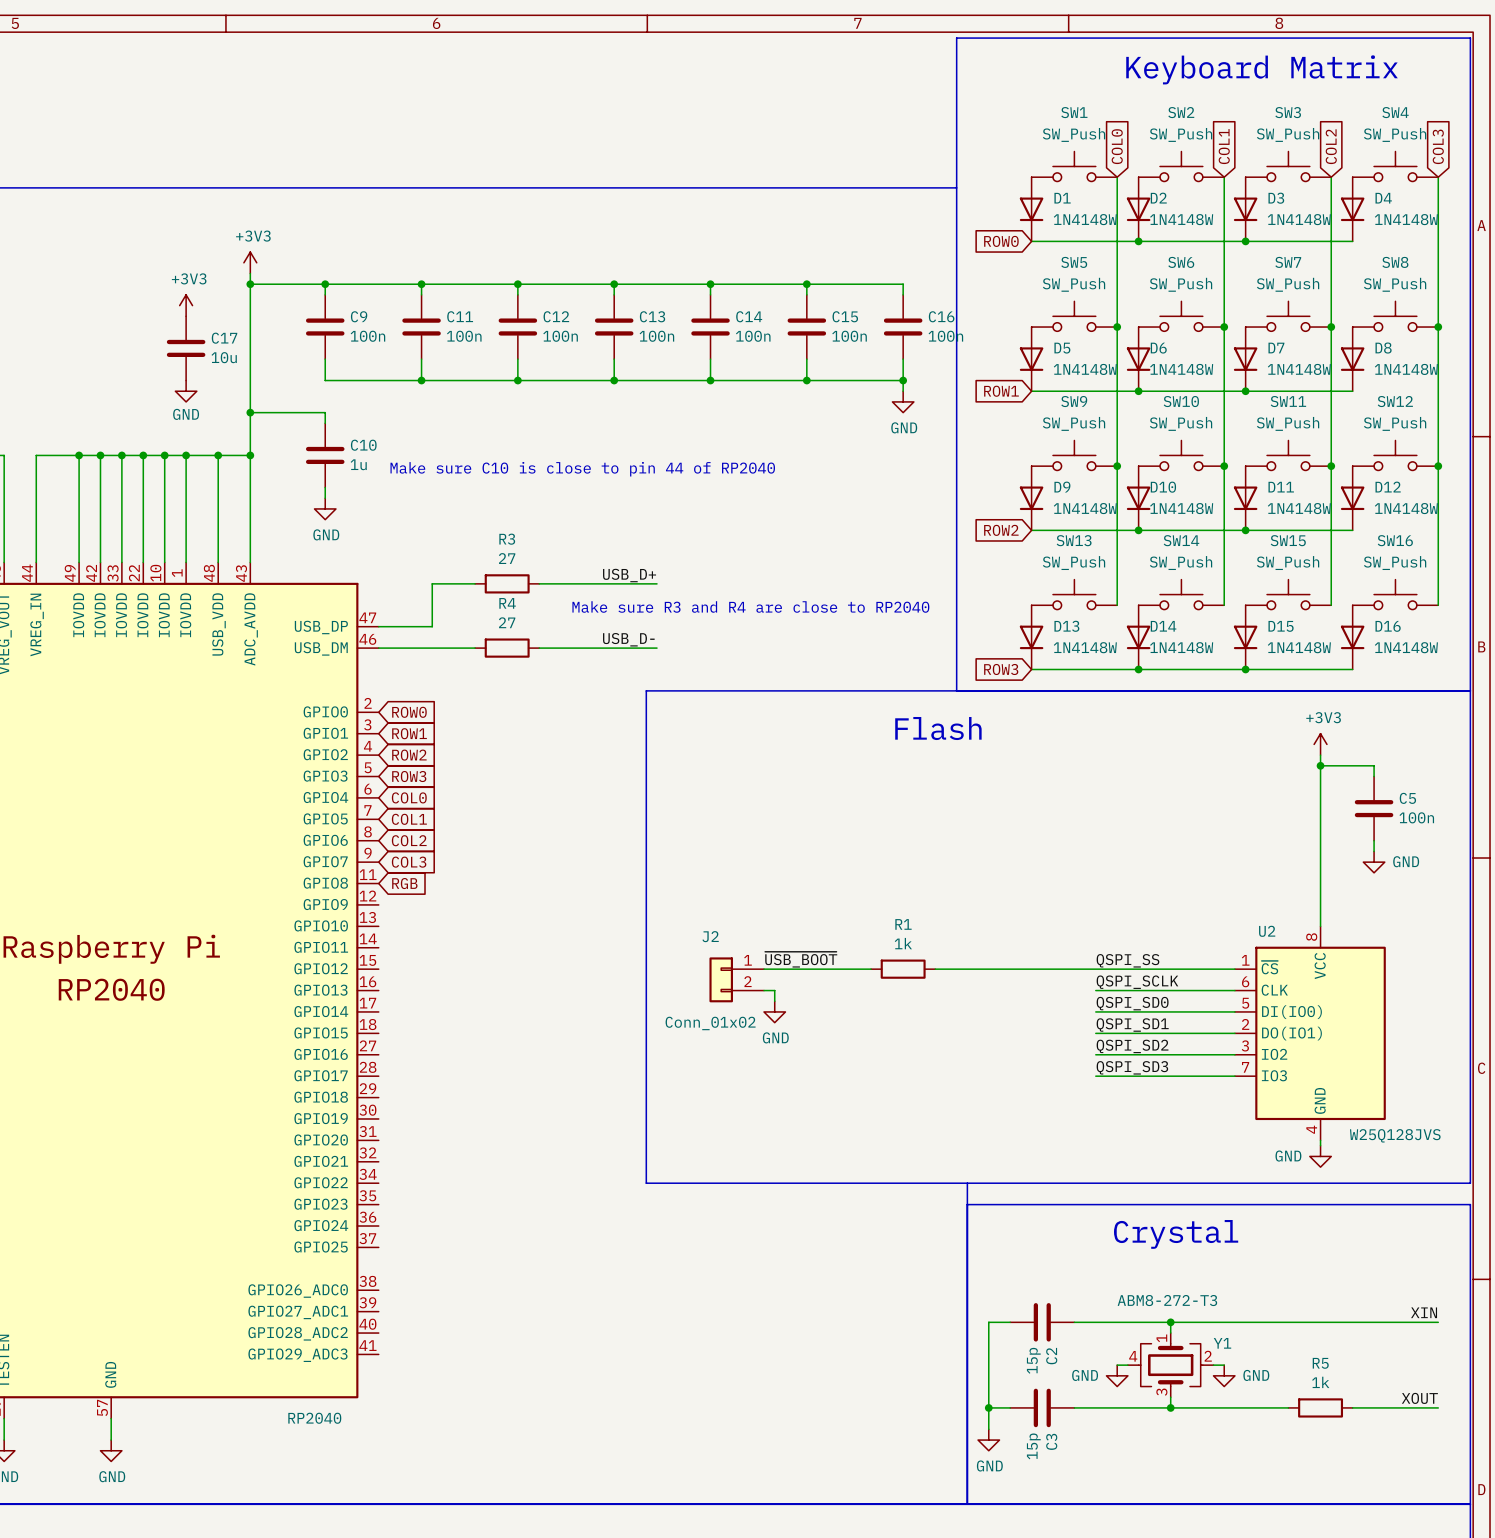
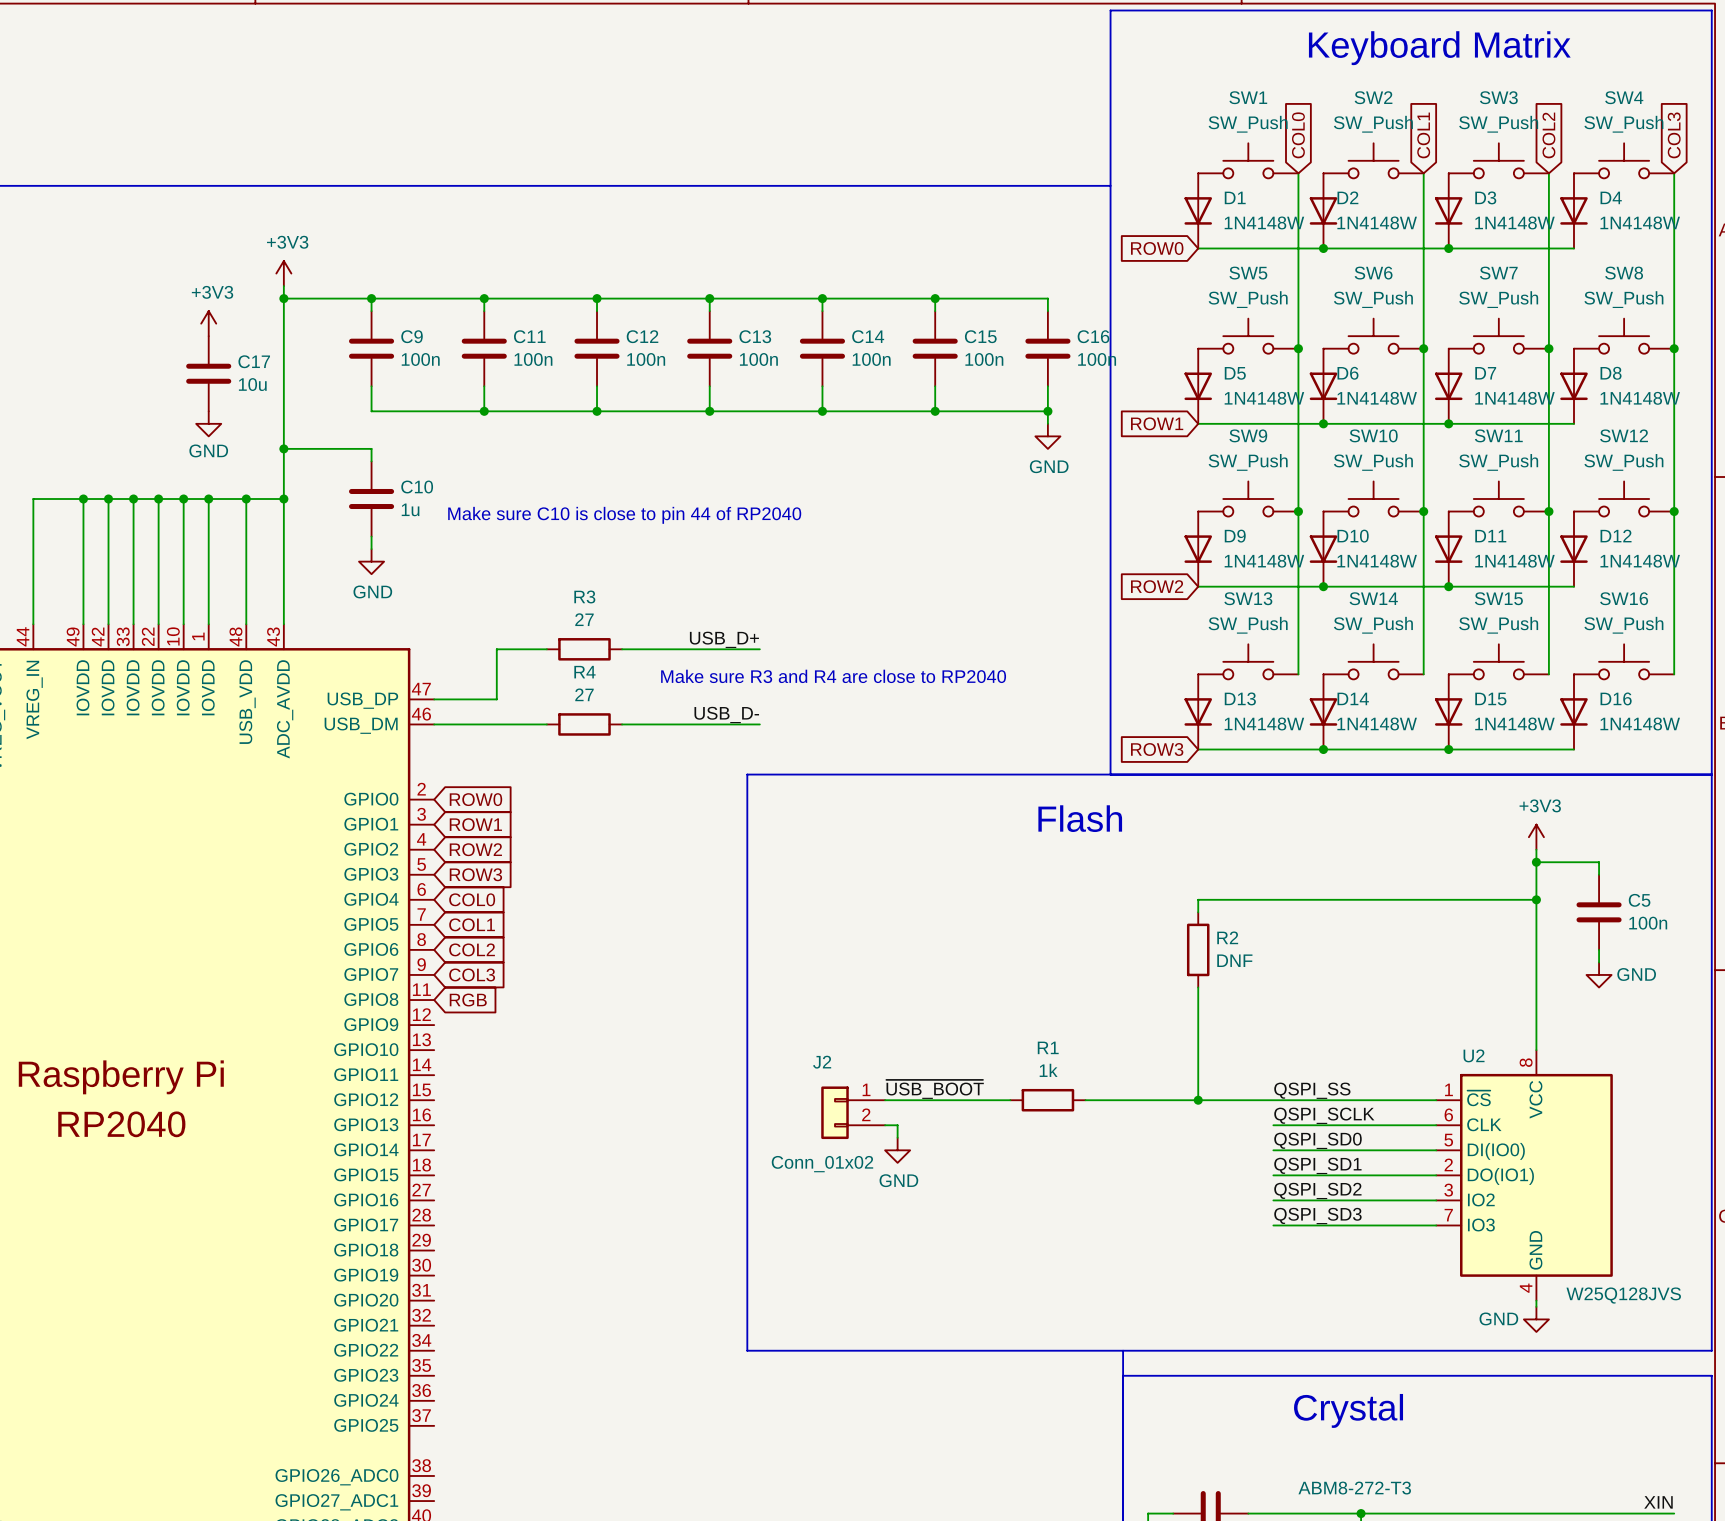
wire: none -> (1536, 899) (1198, 899) (1198, 912)
junction: none -> (1536, 899)
R2: none -> DNF (1198, 949)
wire: none -> (1198, 987) (1198, 1100)
junction: none -> (1198, 1100)

